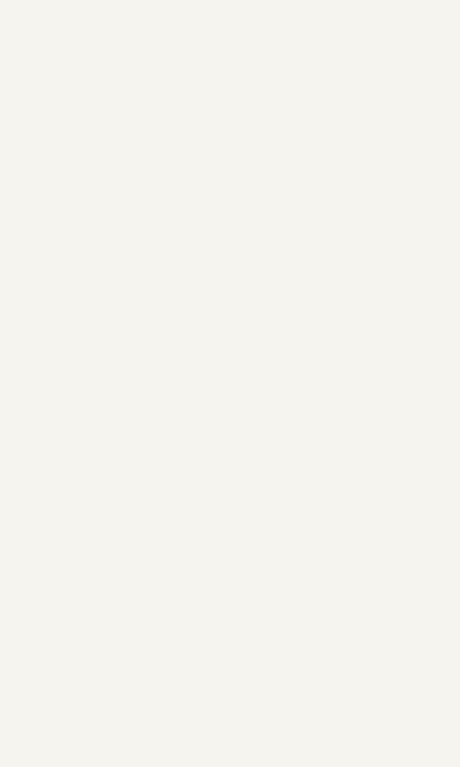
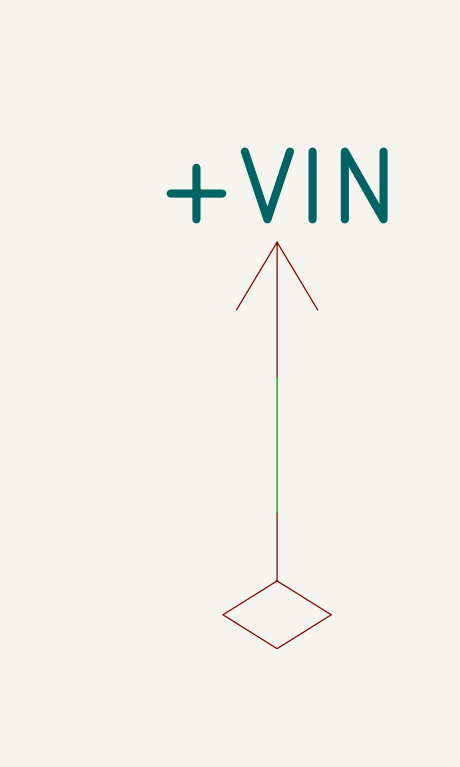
power symbol: none -> +VIN (277, 309)
wire: none -> (277, 377) (277, 513)
power symbol: none -> (277, 580)

